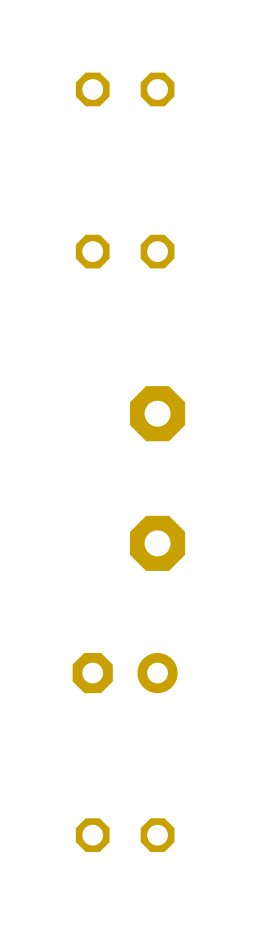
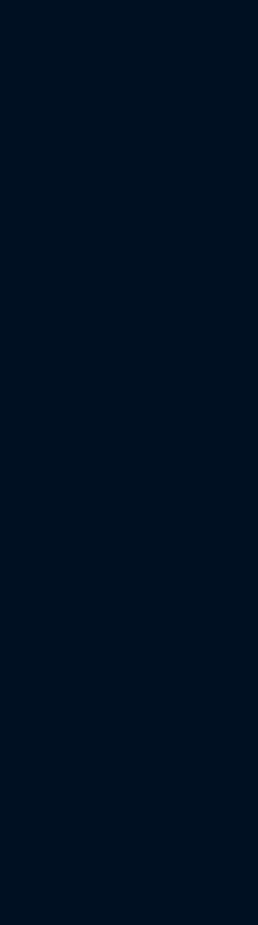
part: (125, 89) -> none
part: (125, 251) -> none
part: (157, 413) -> none
part: (157, 543) -> none
part: (125, 673) -> none
part: (125, 835) -> none

